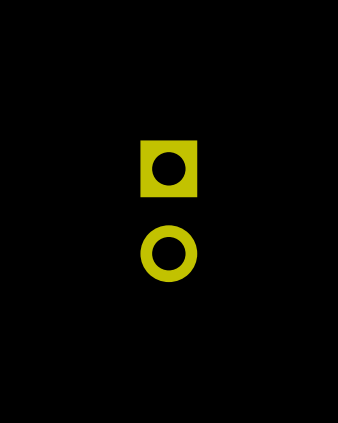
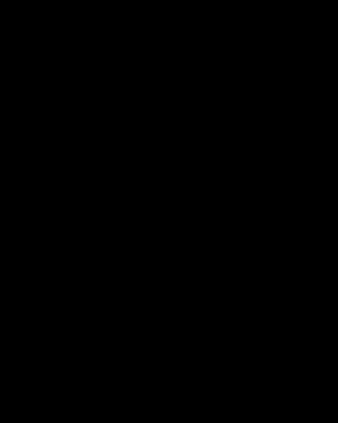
part: (168, 211) -> none

